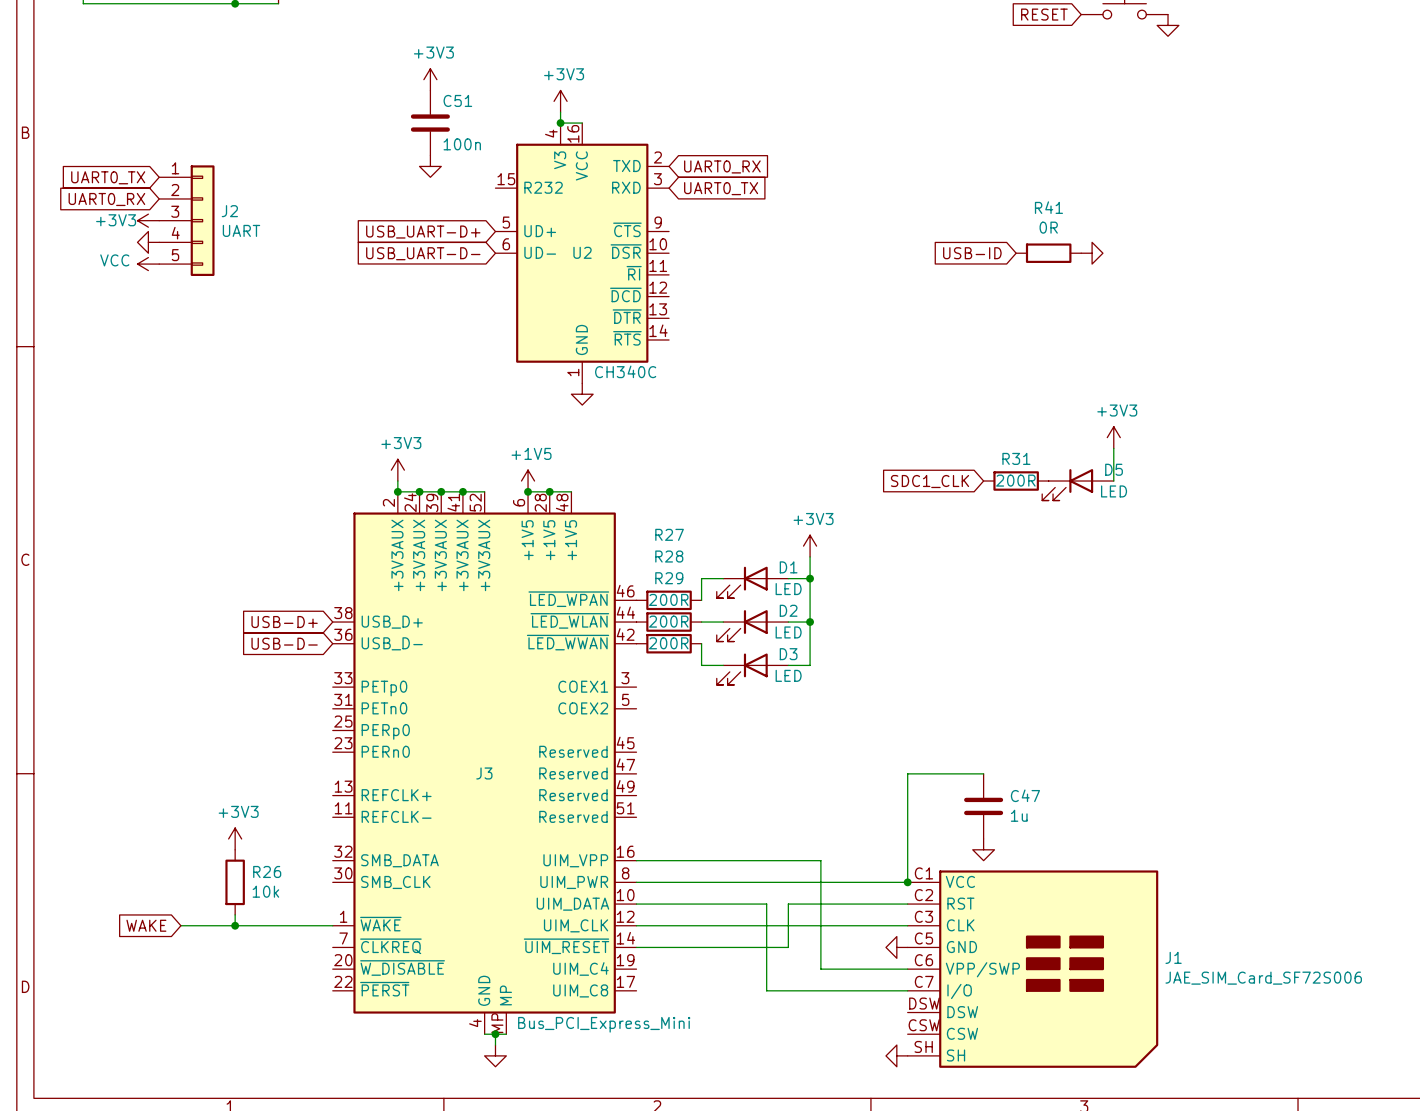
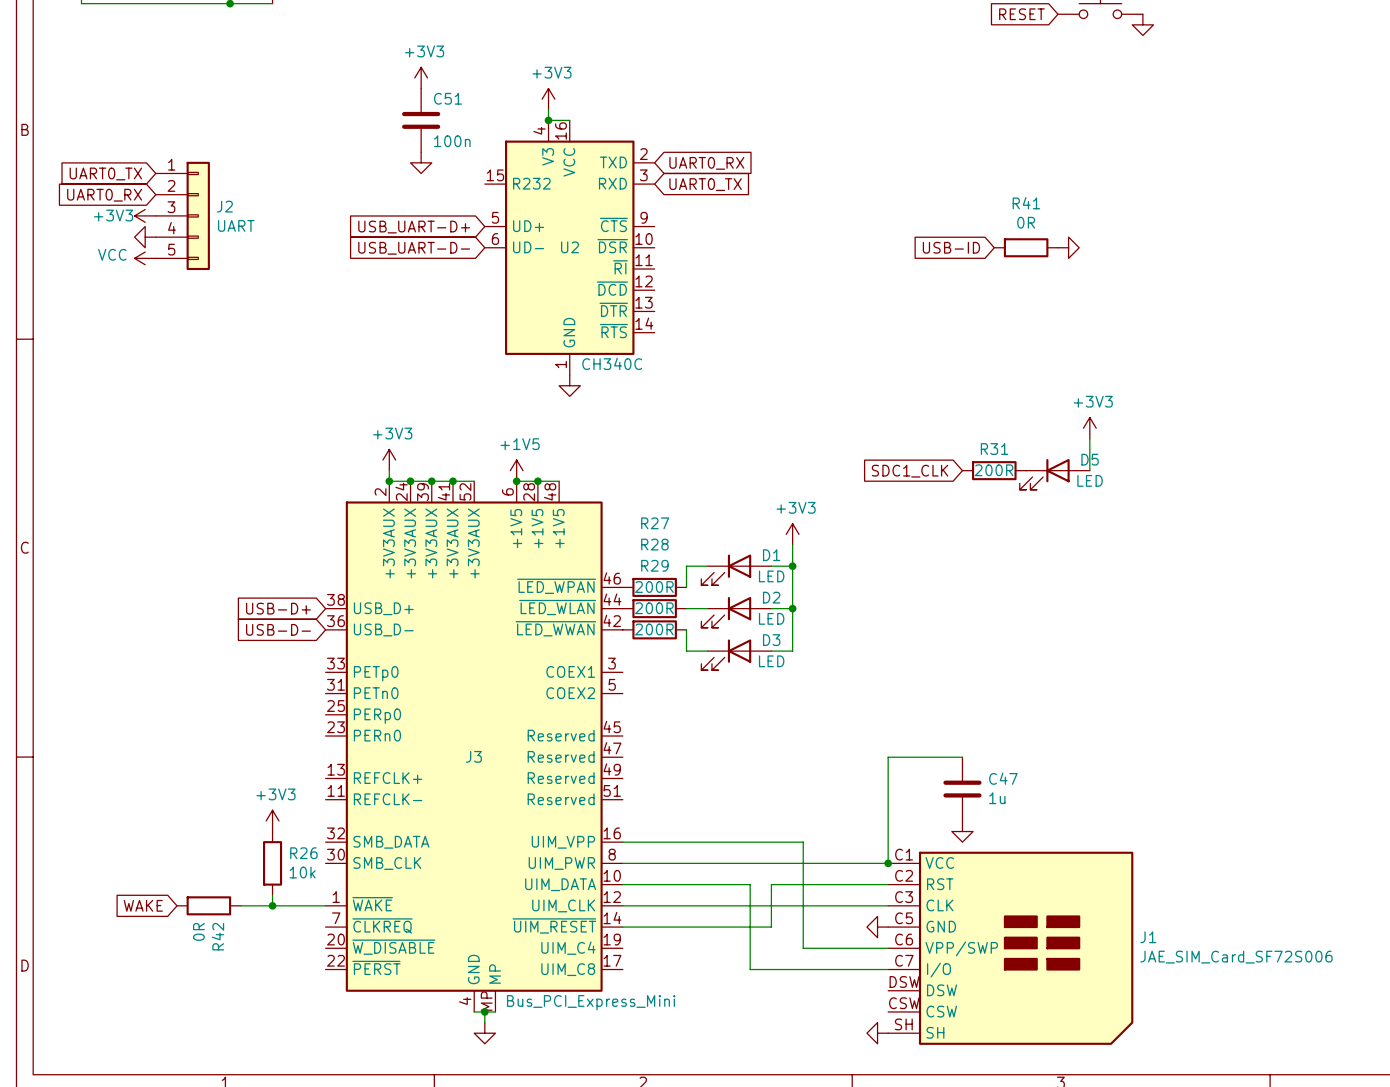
power symbol position: +3V3 (235, 838) -> +3V3 (272, 820)
R26 position: (235, 882) -> (272, 863)
wire: (180, 925) (245, 925) -> none
R42: none -> 0R (208, 905)
junction position: (235, 925) -> (272, 905)

